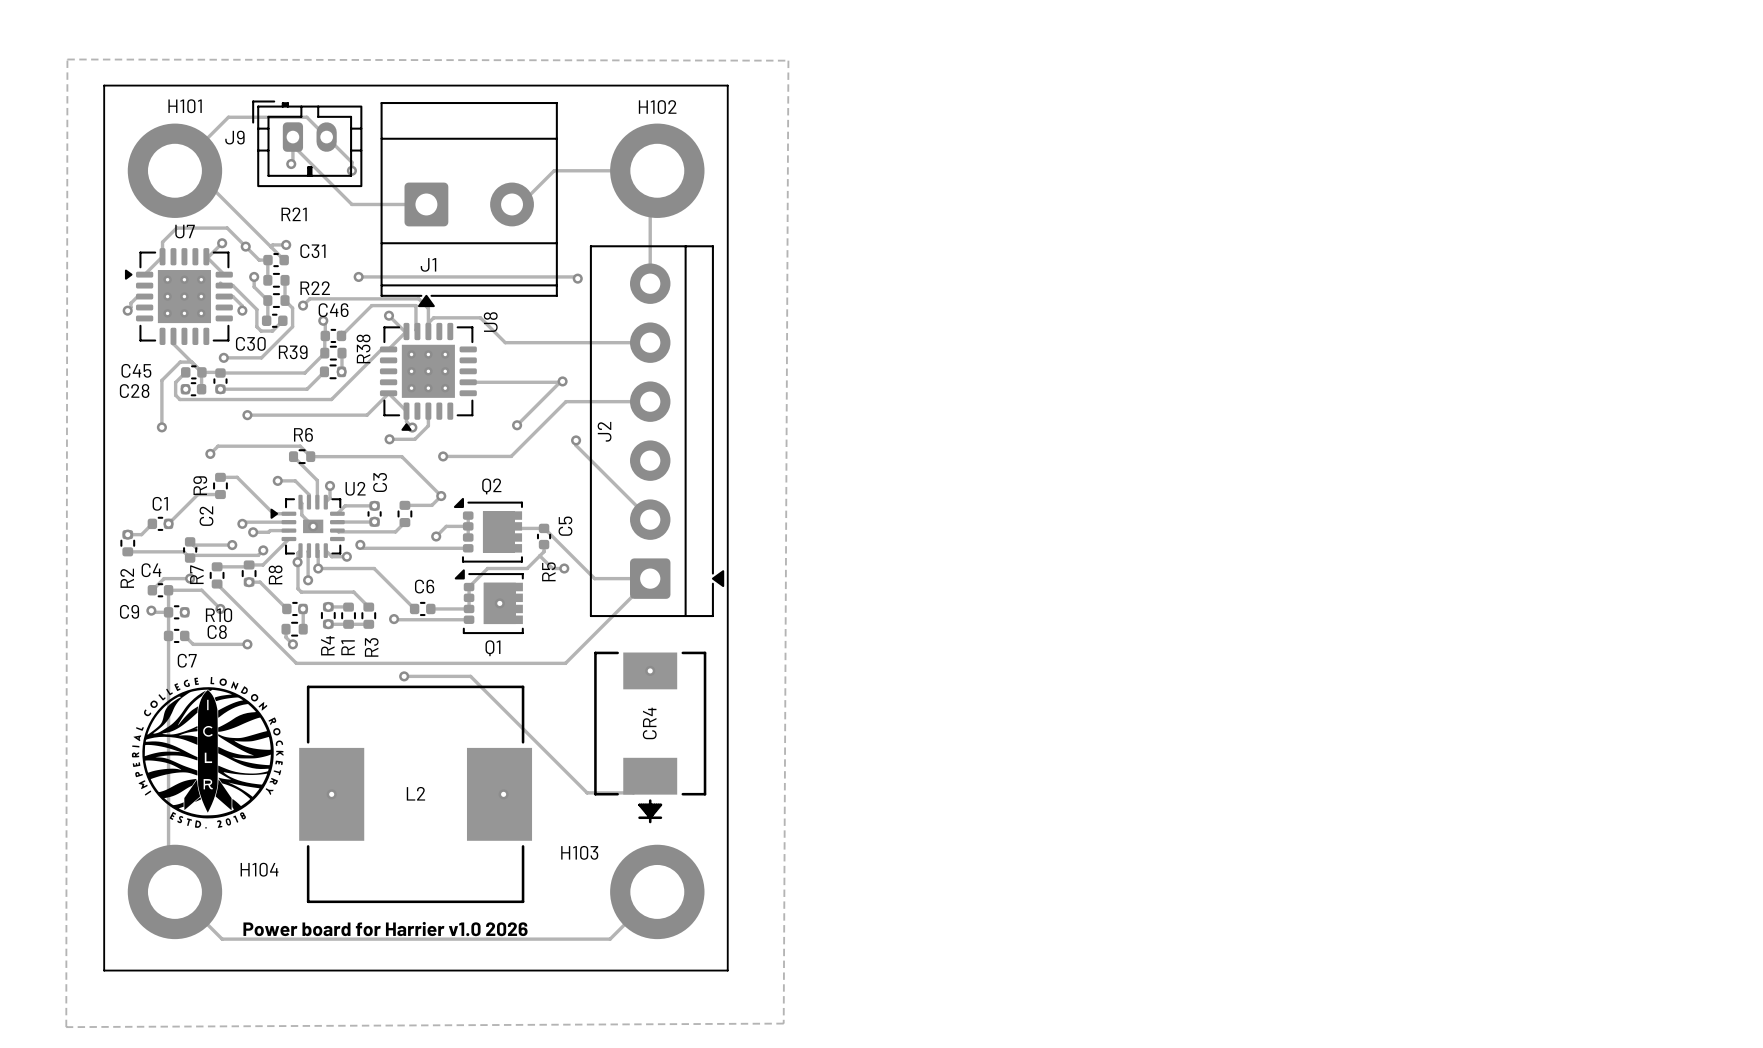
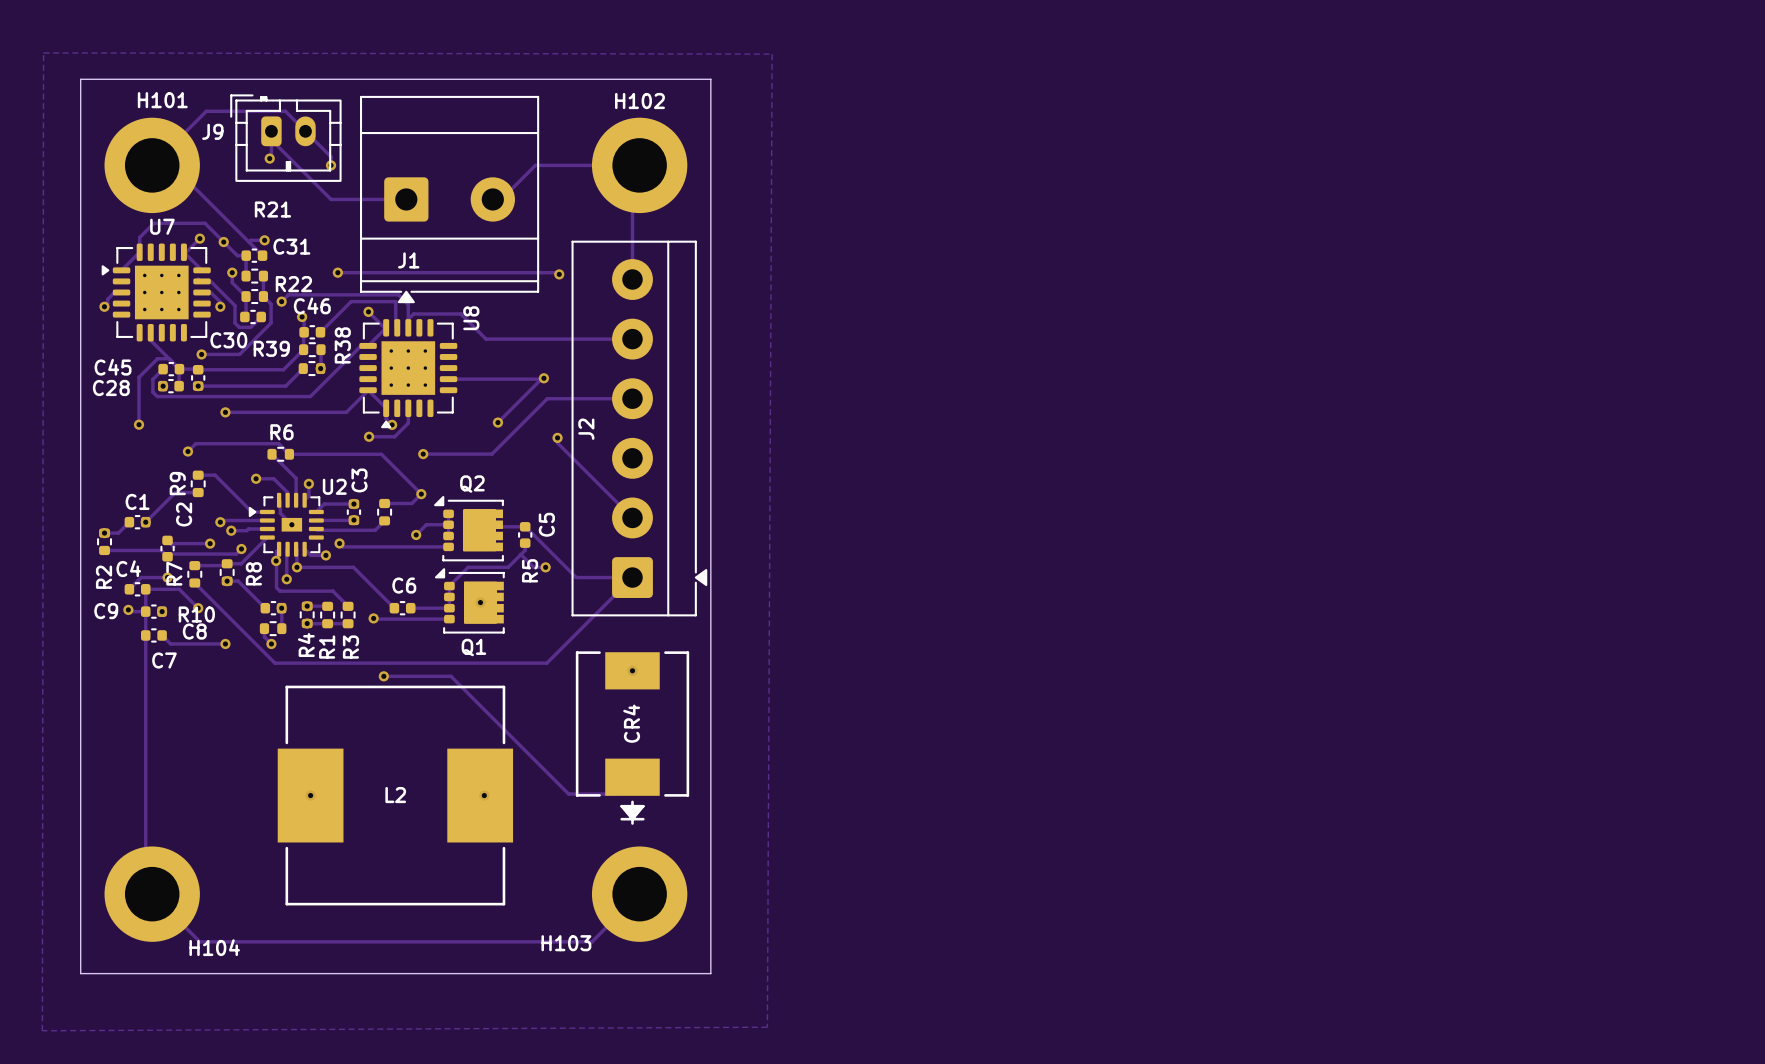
drawing: [131, 676, 284, 829] -> none
H103 name position: H103 (579, 852) -> H103 (566, 943)
H104 name position: H104 (259, 869) -> H104 (214, 947)
text: Power board for Harrier v1.0 2026 (385, 929) -> none

